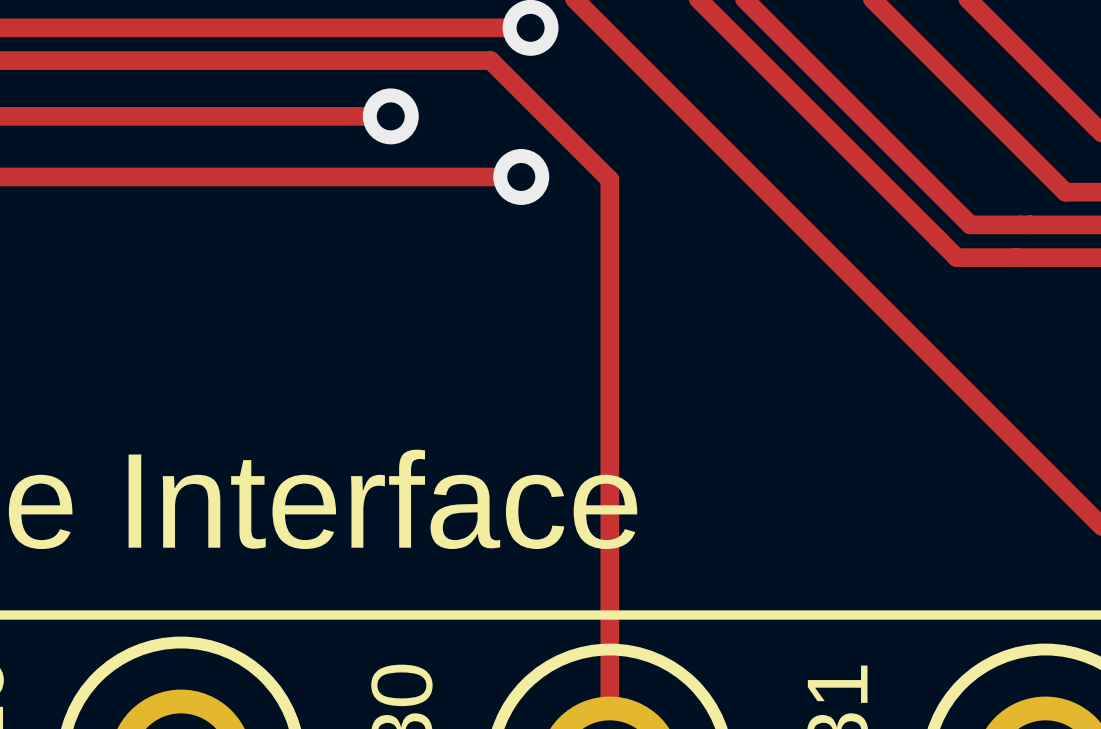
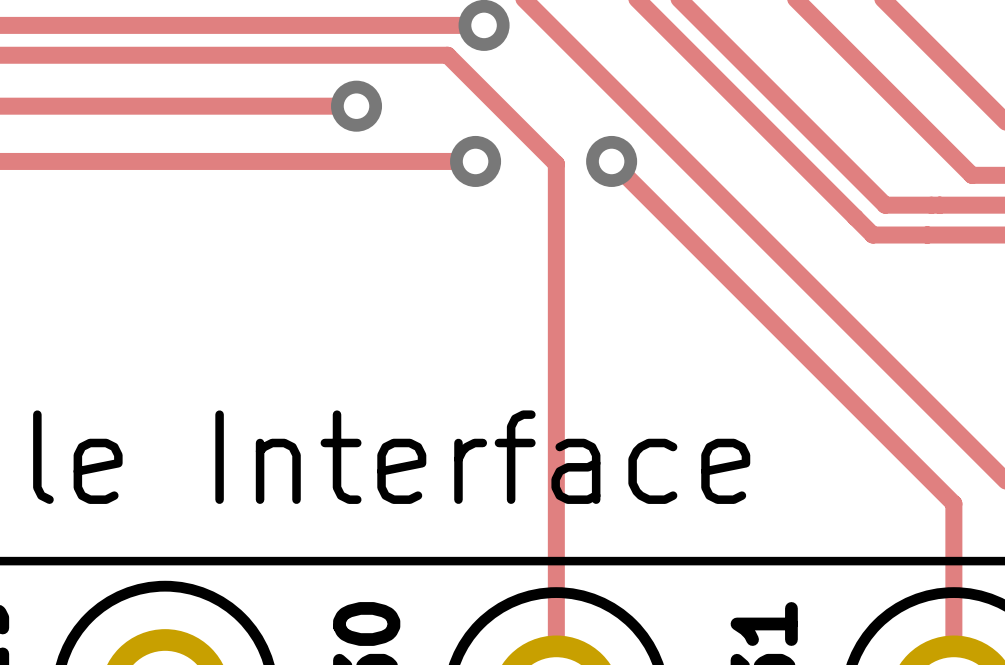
track: none -> (611, 161) (953, 503) (953, 636)
via: none -> (611, 161)

